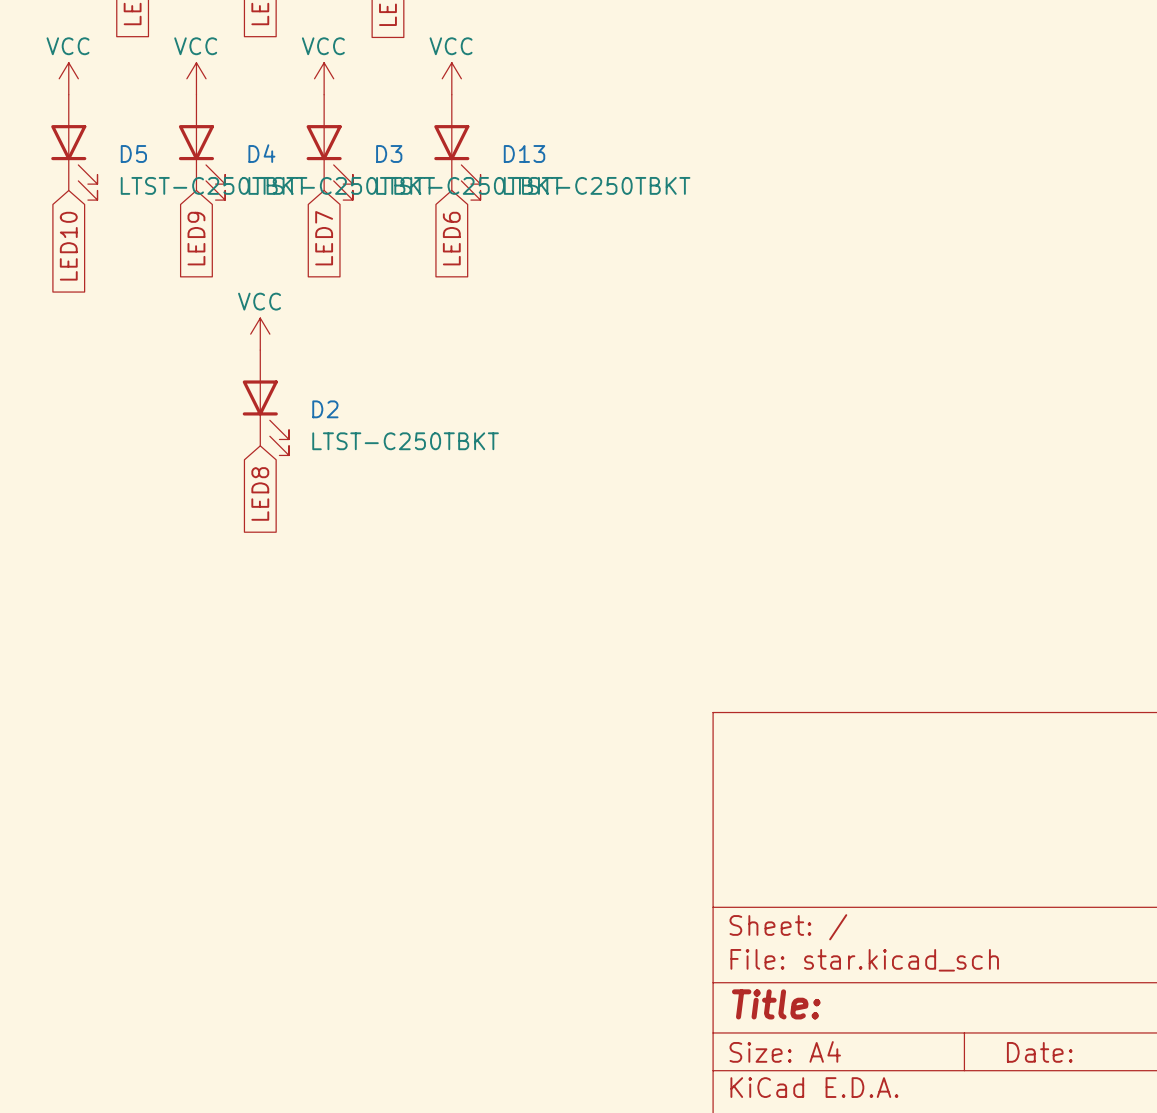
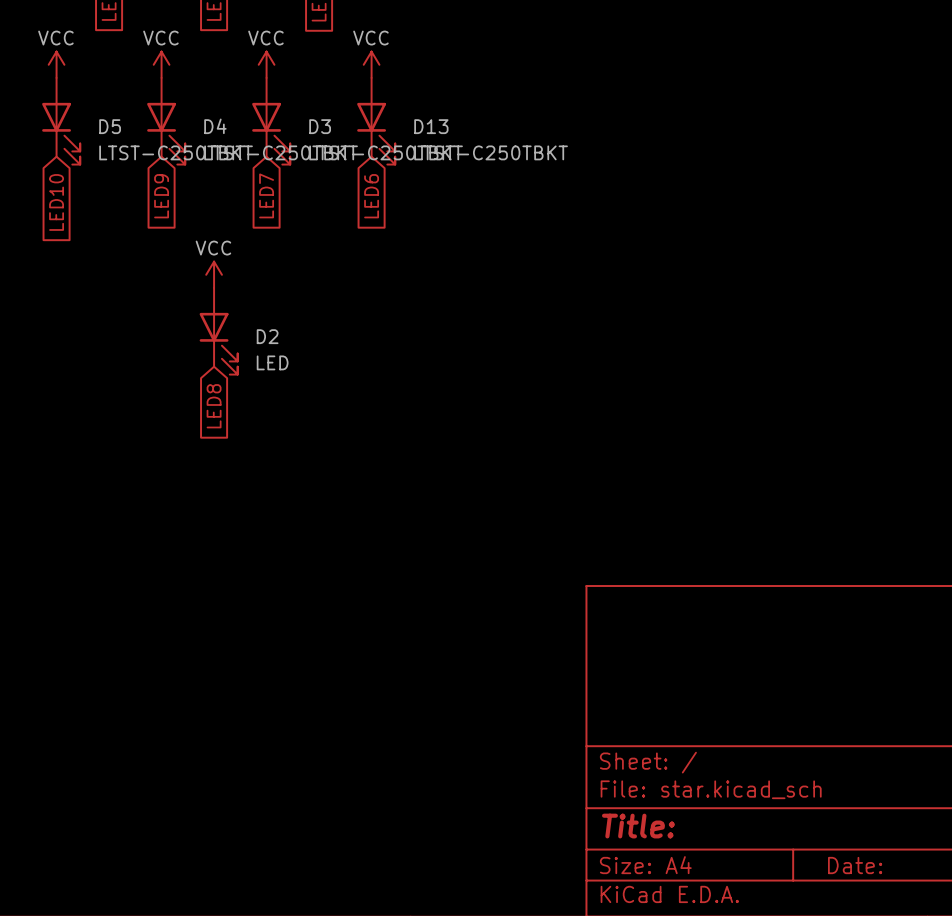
D2 value: LTST-C250TBKT (405, 441) -> LED (272, 362)

